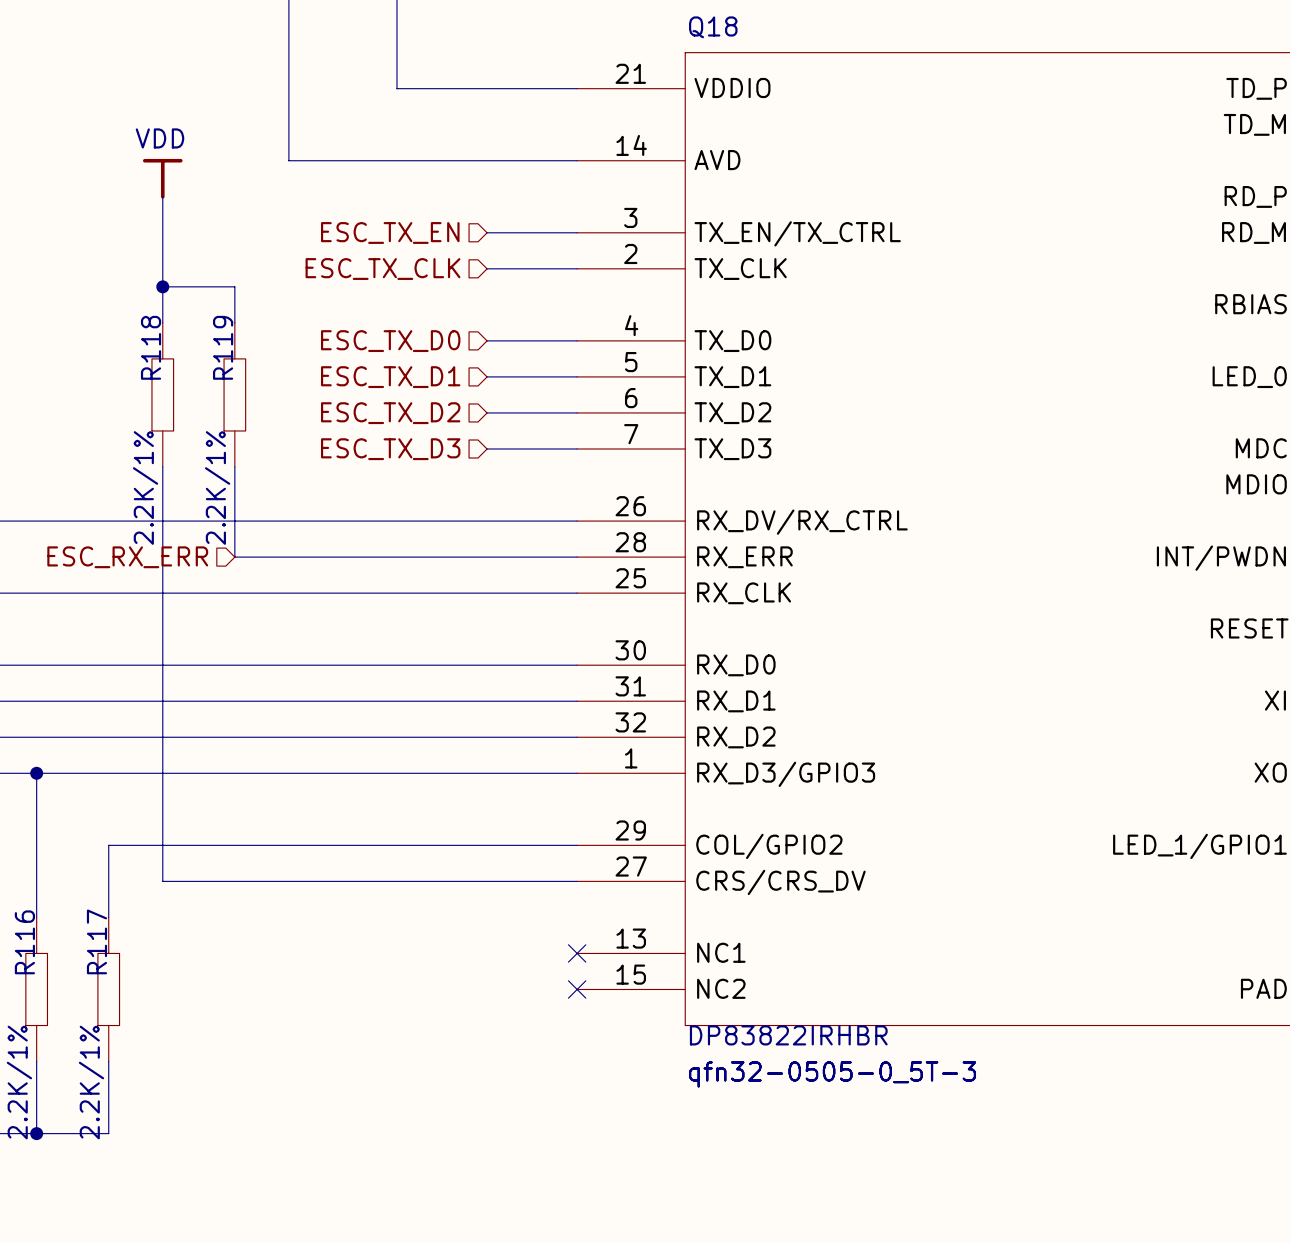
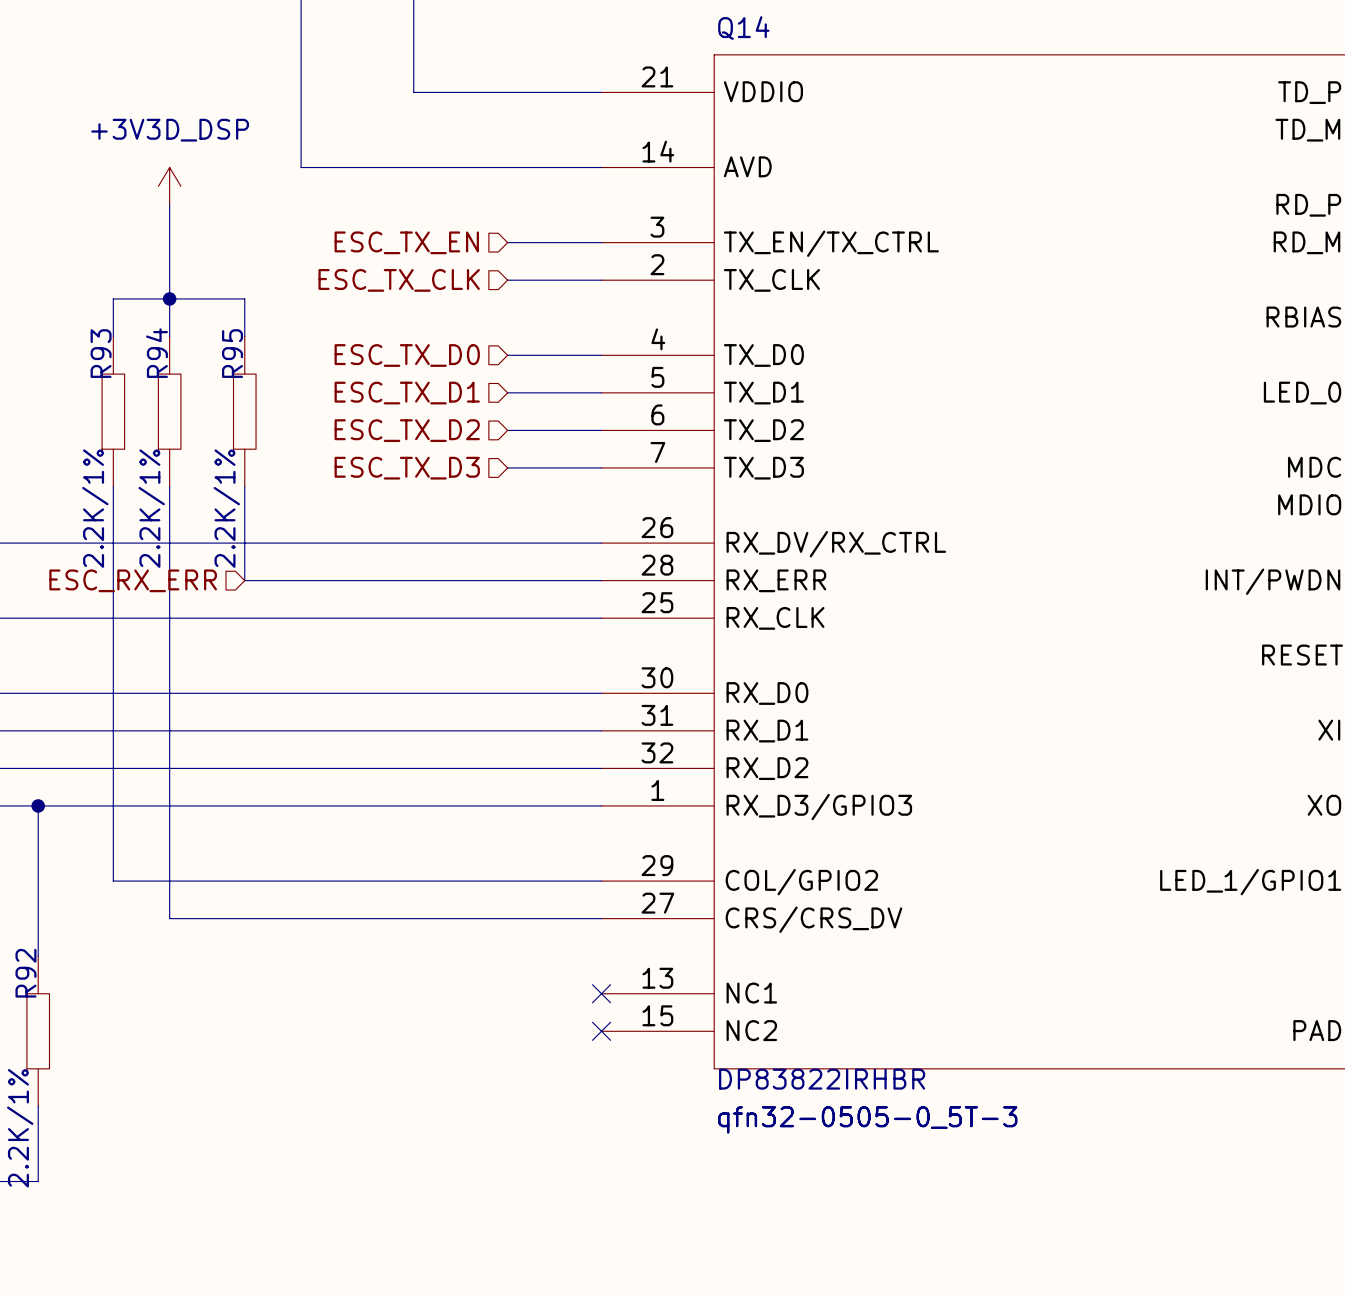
Q18 name: Q18 (713, 27) -> Q14 (743, 28)
power symbol: VDD (162, 178) -> +3V3D_DSP (169, 186)
wire: none -> (169, 298) (113, 298) (113, 336)
R118 name: R118 (151, 347) -> R94 (156, 353)
R119 name: R119 (223, 347) -> R95 (232, 353)
R93: none -> 2.2K/1% (113, 411)
wire: (108, 845) (108, 917) -> (113, 881) (113, 486)
R116 name: R116 (24, 942) -> R92 (25, 973)
R117: 2.2K/1% (108, 989) -> none
wire: (108, 1061) (108, 1133) (36, 1133) -> none
junction: (36, 1133) -> none

